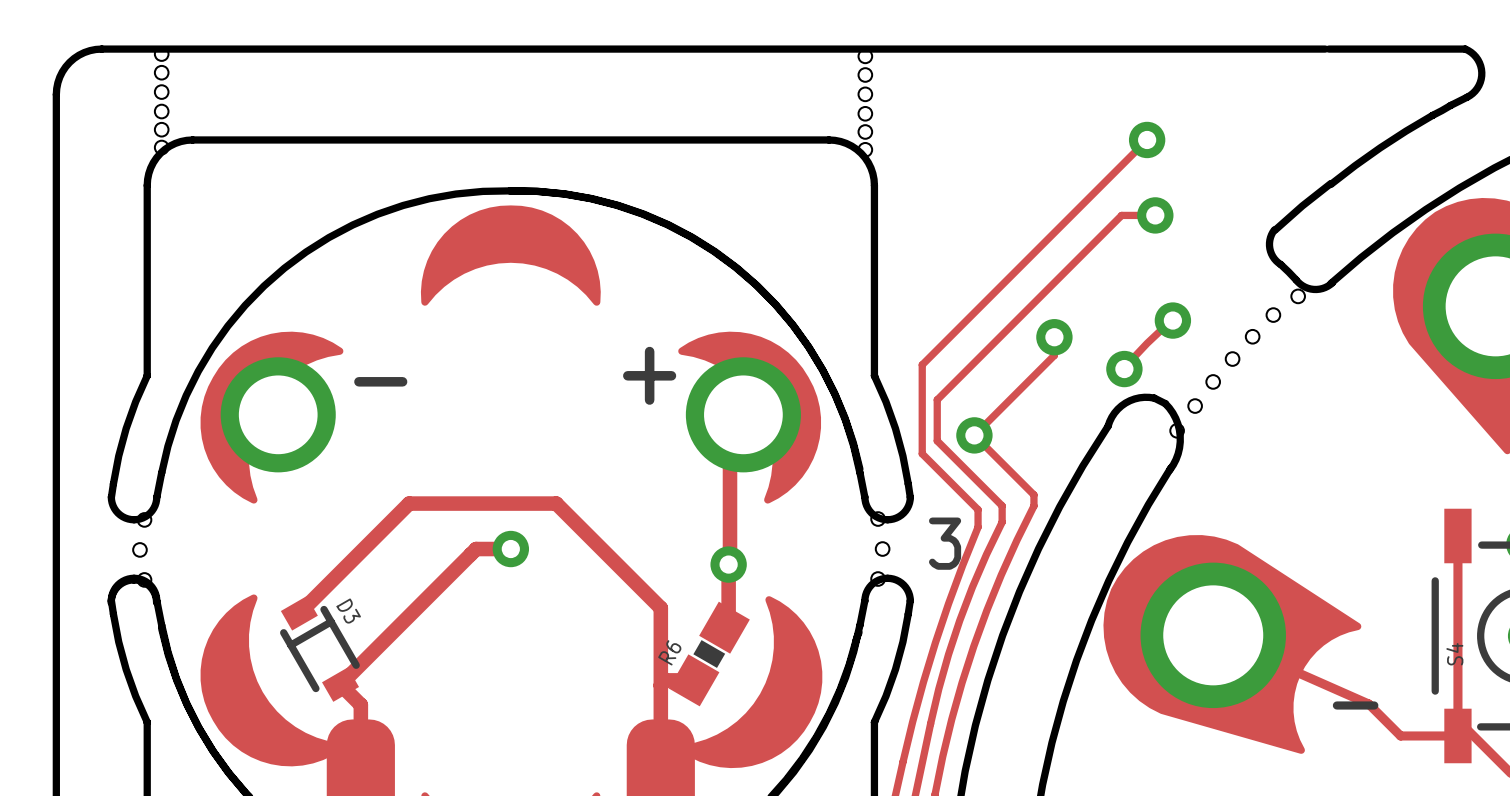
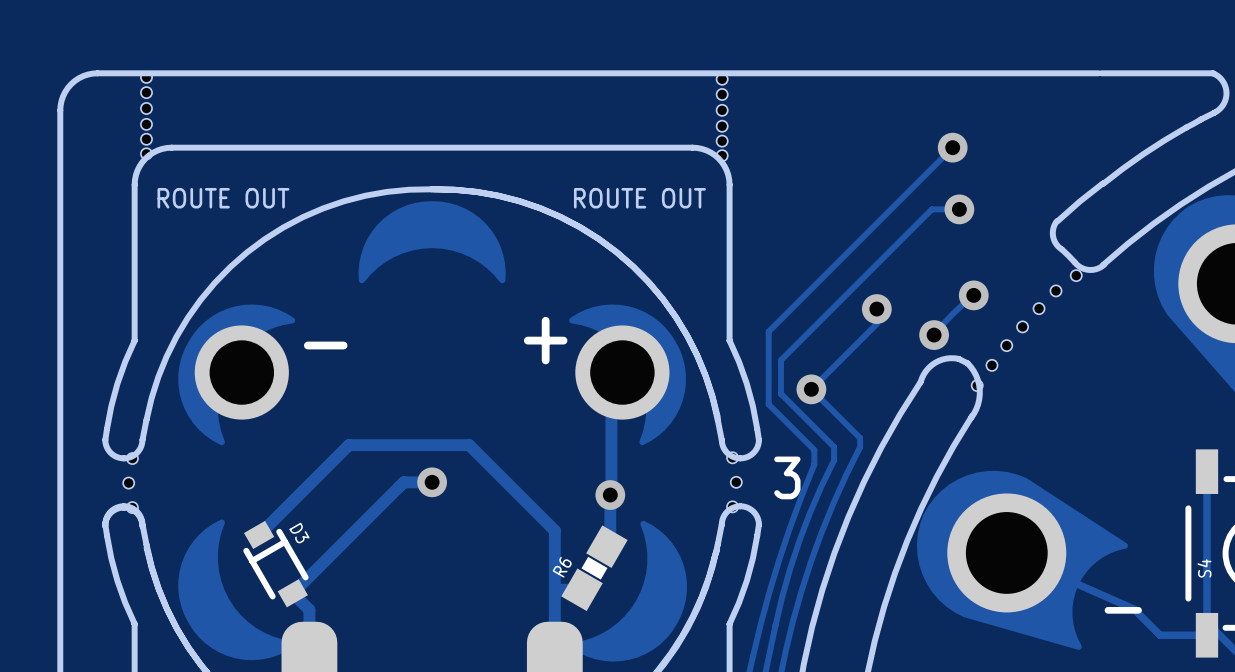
text: none -> ROUTE OUT (223, 198)
text: none -> ROUTE OUT (639, 198)

